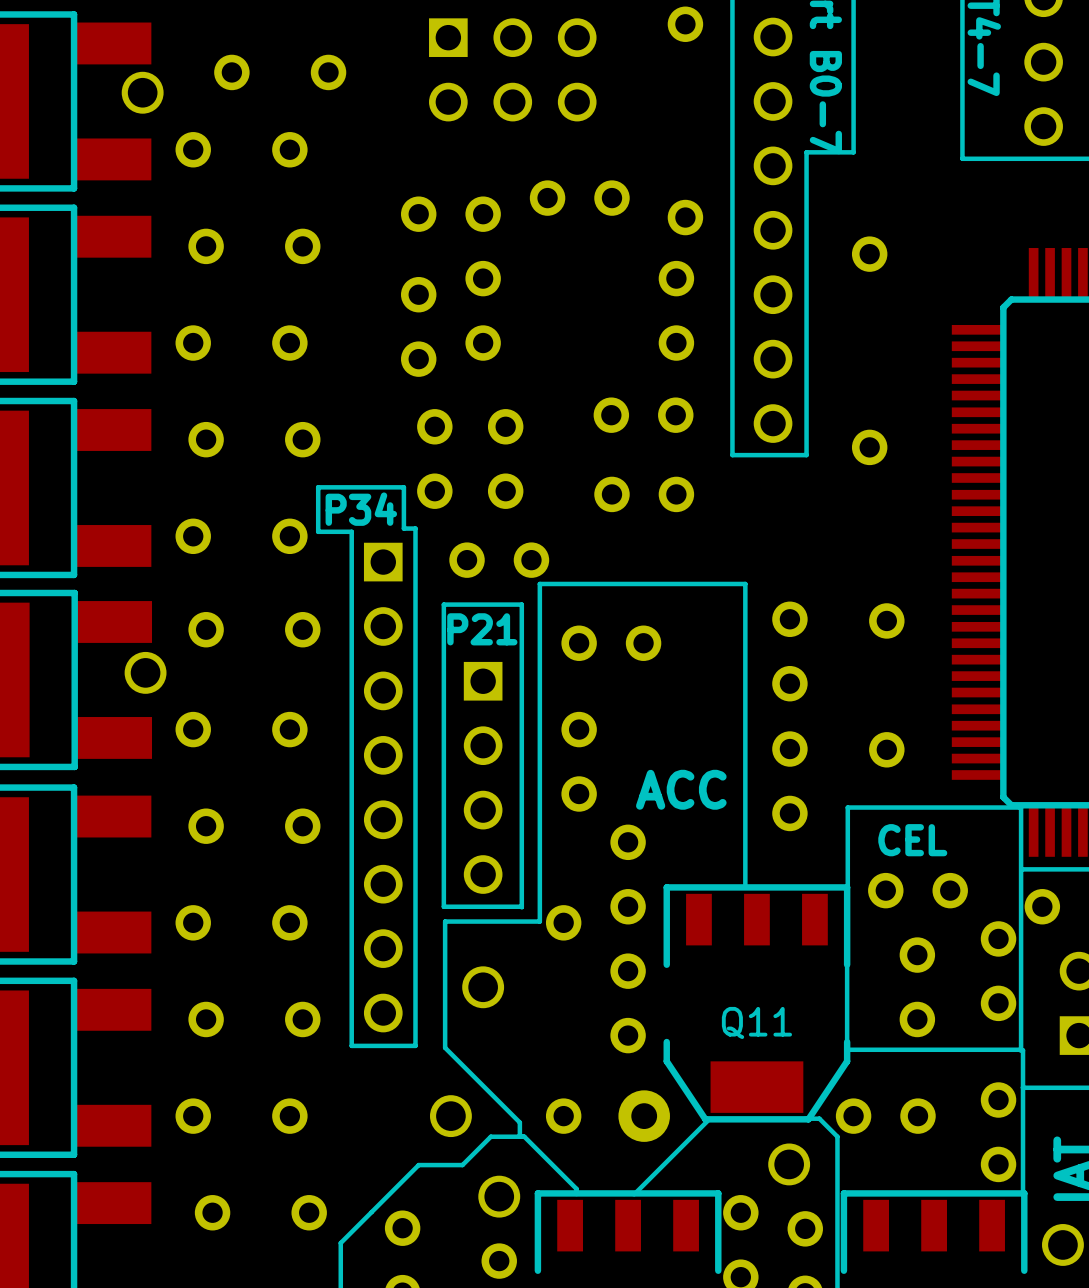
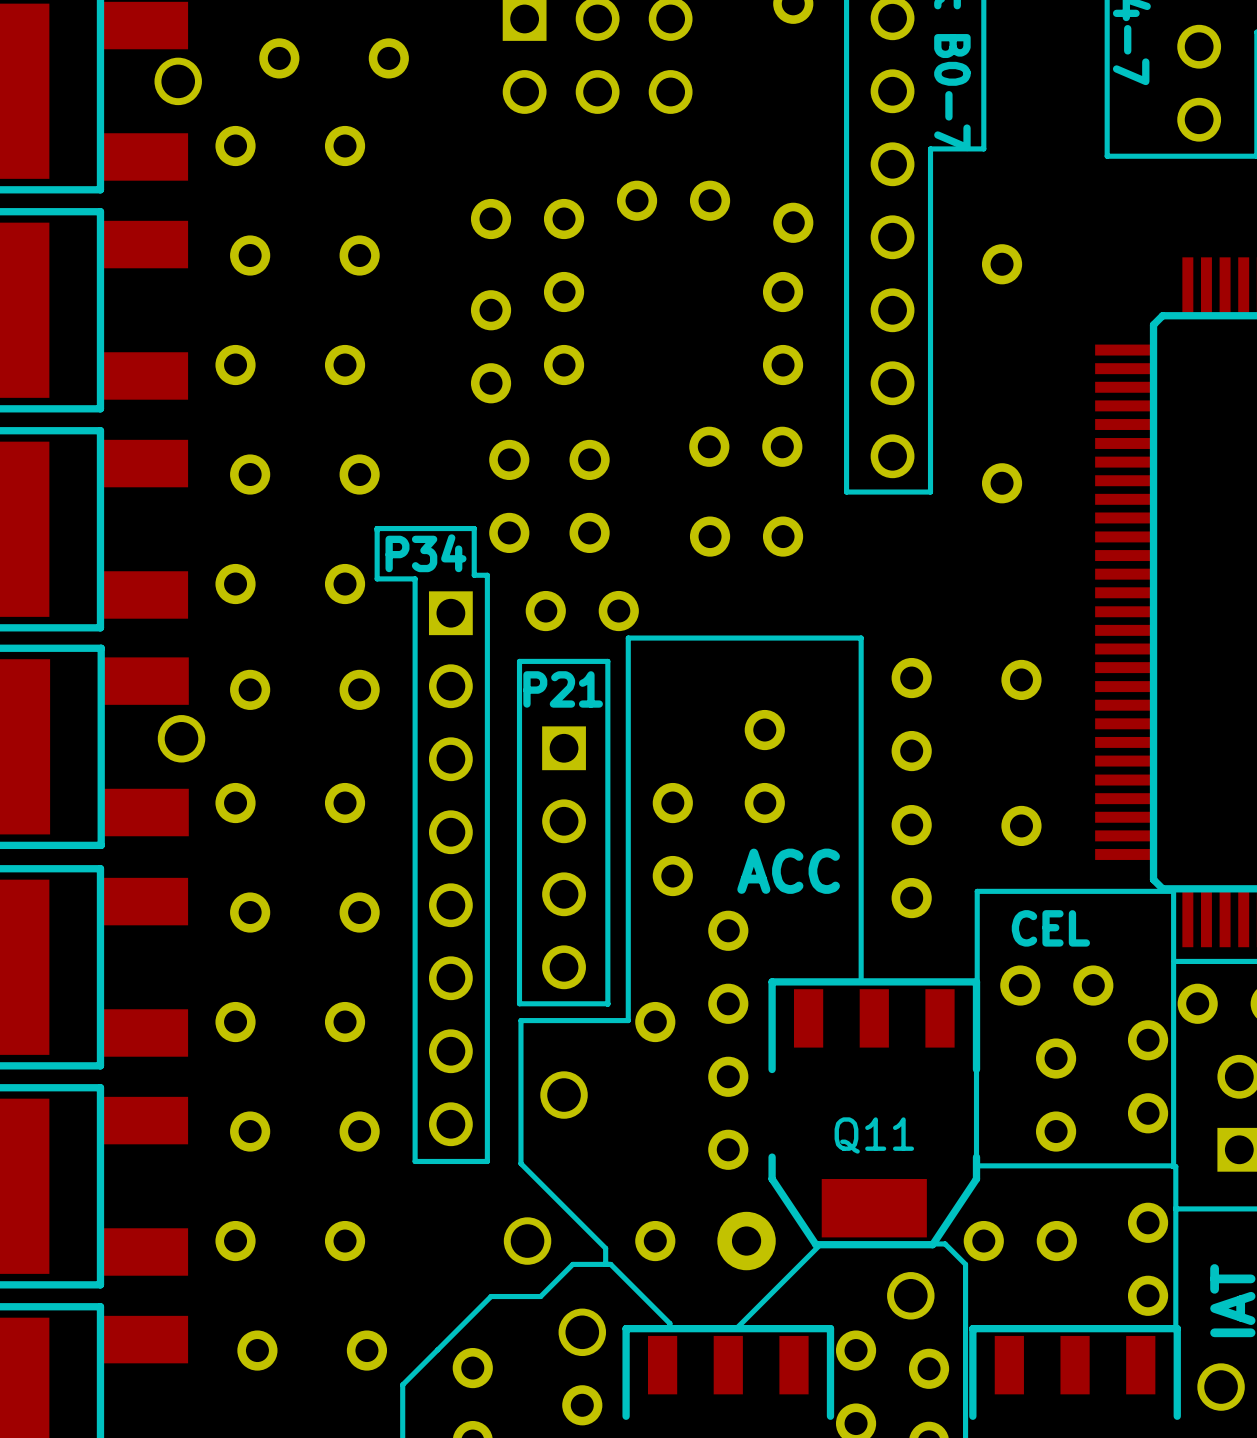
part rotation: 0° (611, 643) -> 90° clockwise (764, 766)
part position: (611, 643) -> (764, 766)

